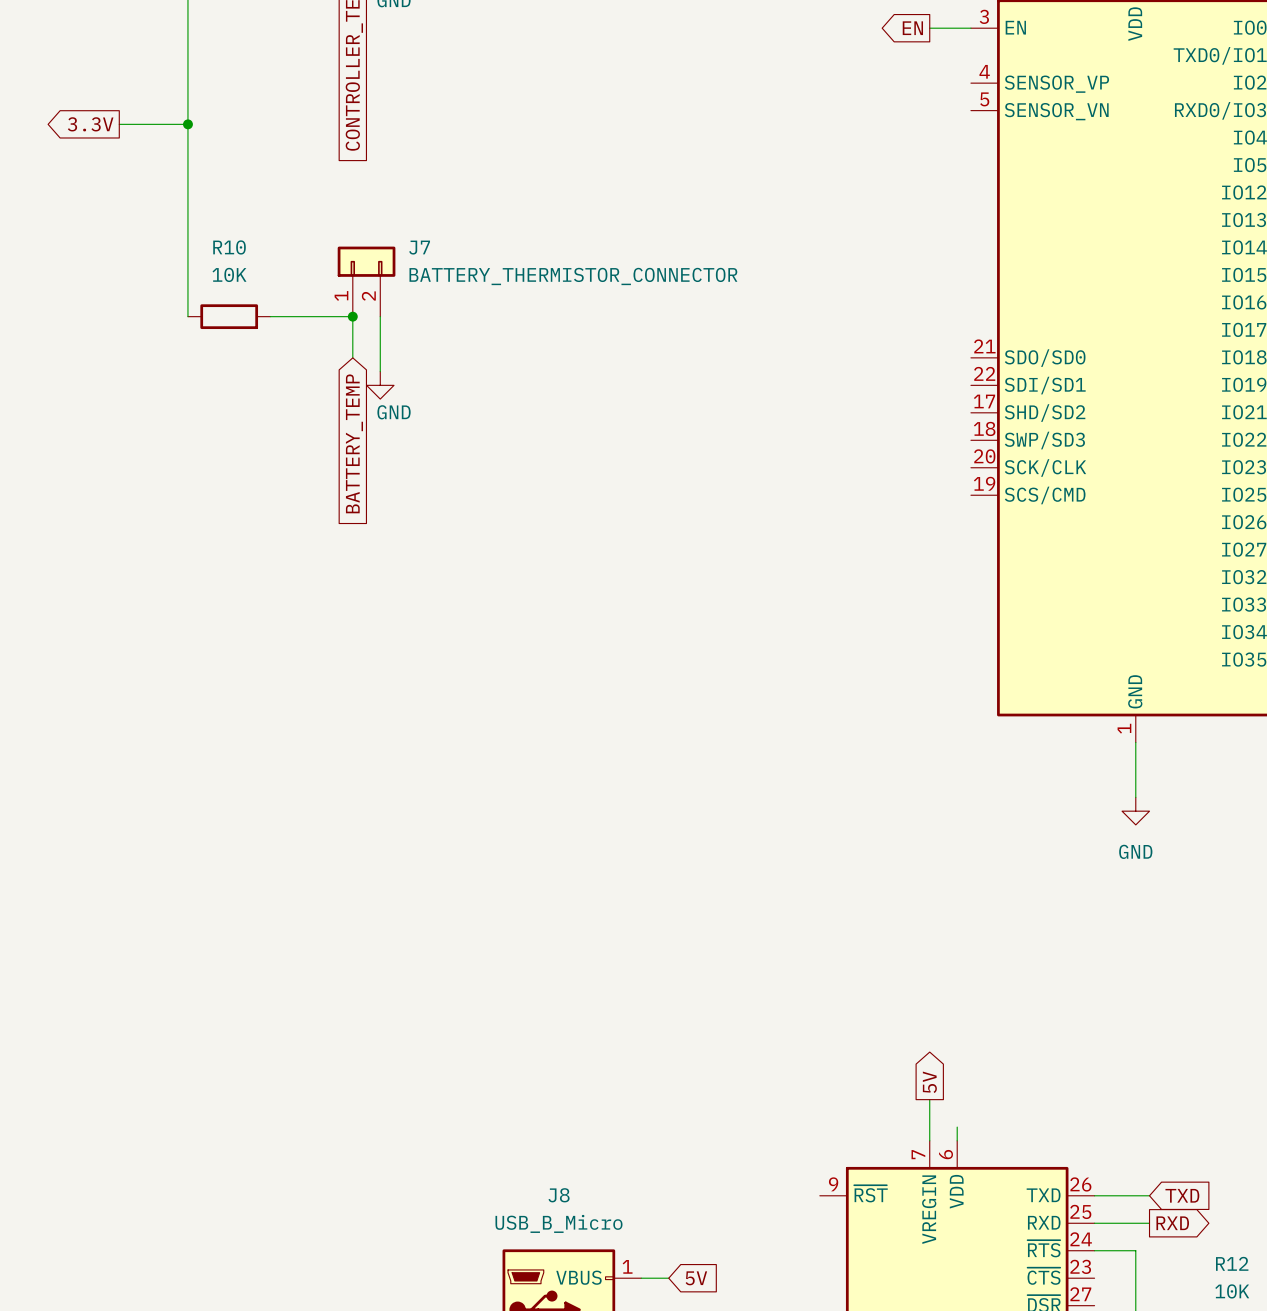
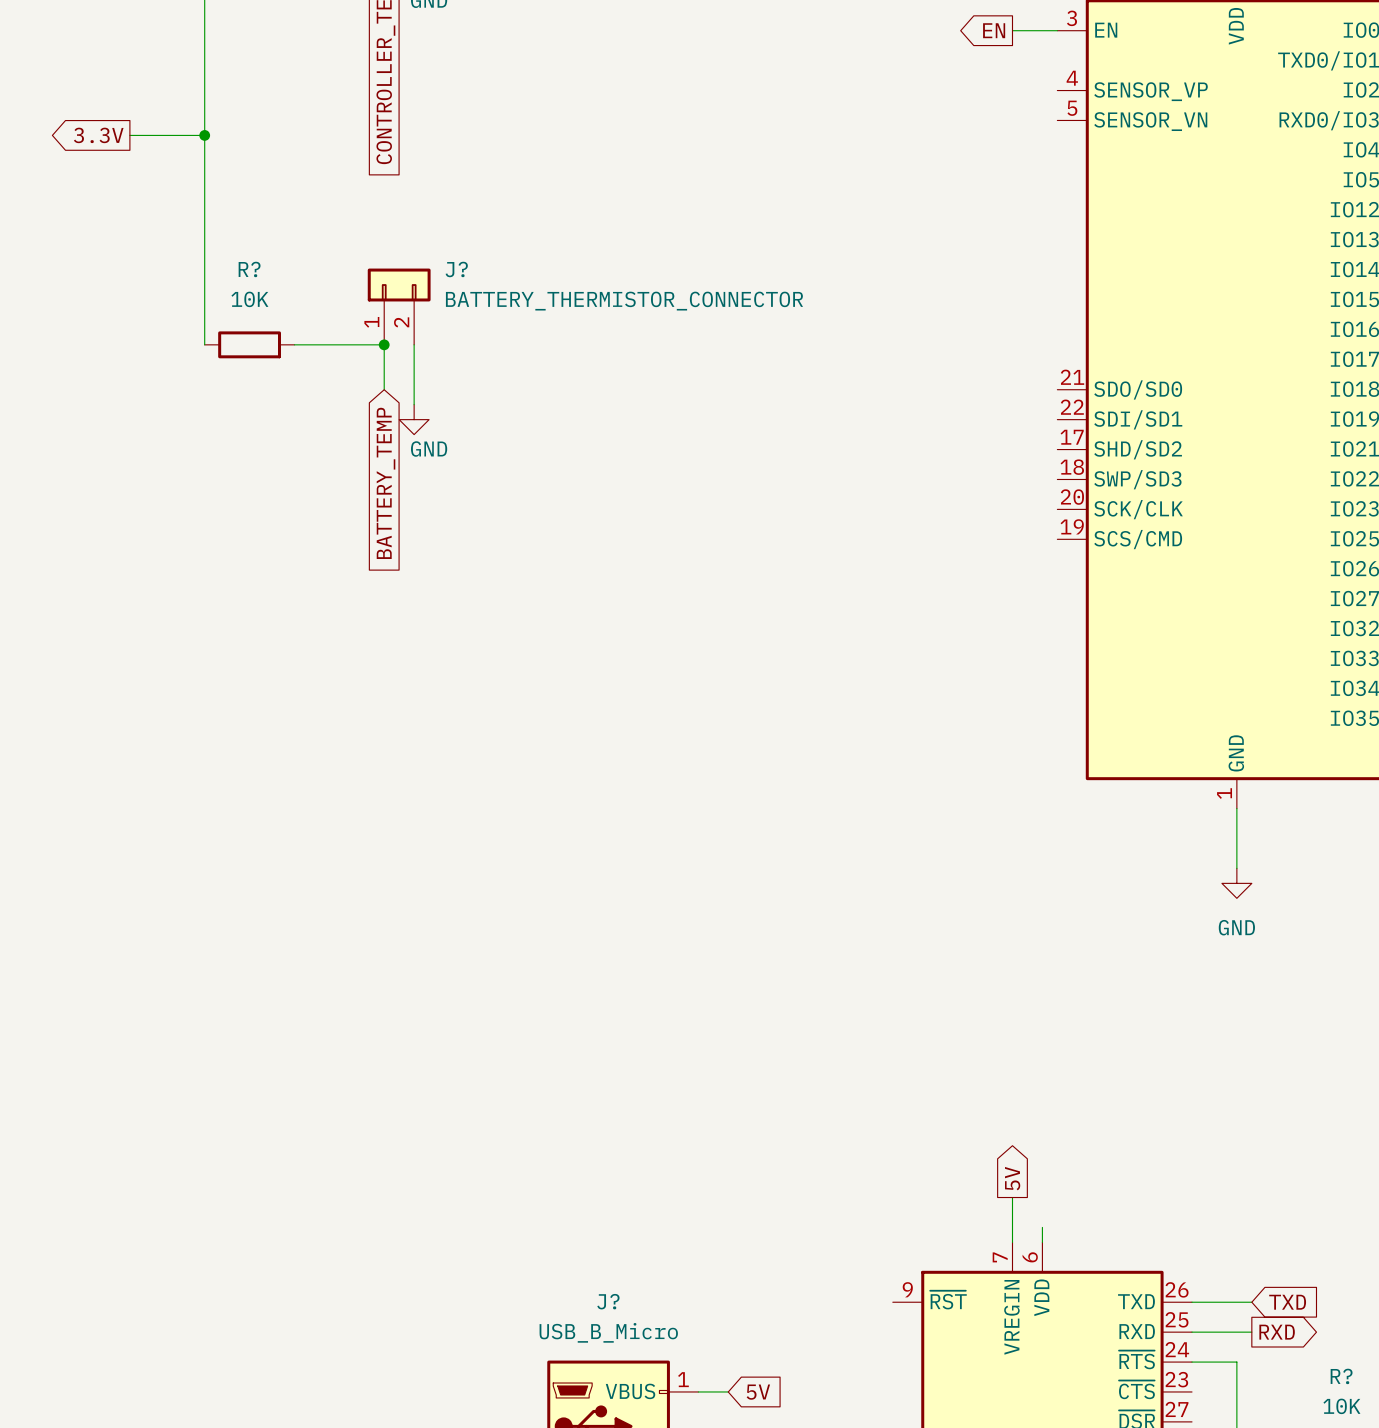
R10 name: R10 (229, 247) -> R? (249, 269)
J7 name: J7 (419, 247) -> J? (456, 269)
J8 name: J8 (559, 1195) -> J? (608, 1301)
R12 name: R12 (1232, 1263) -> R? (1341, 1376)

